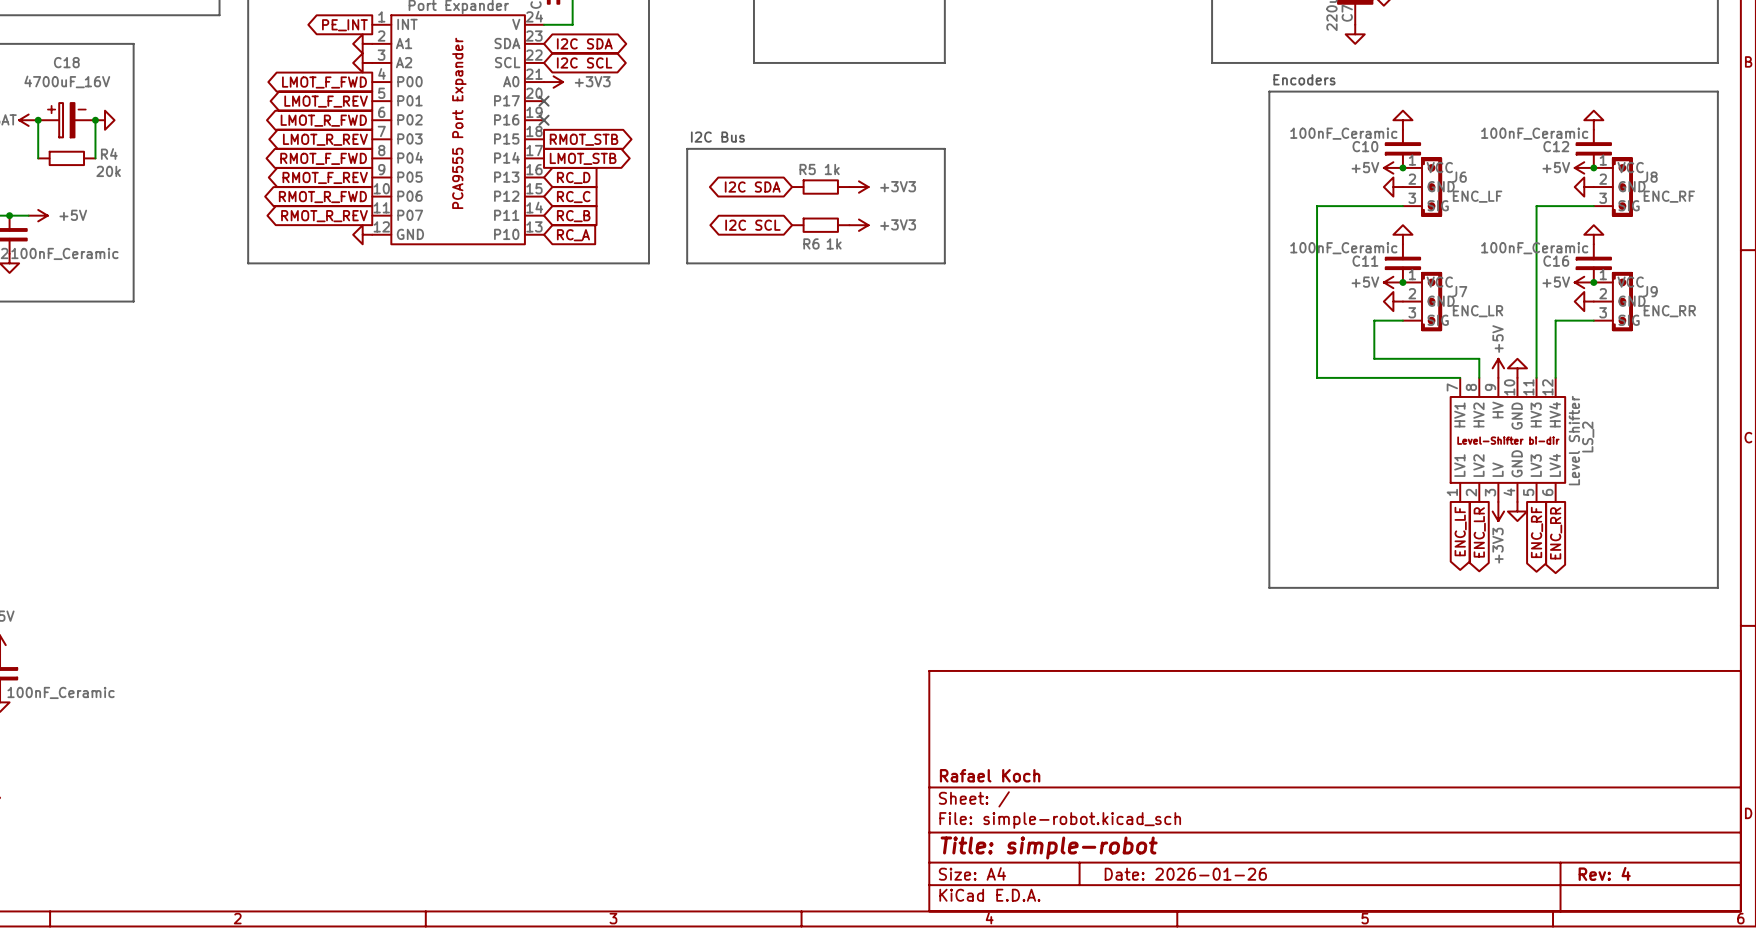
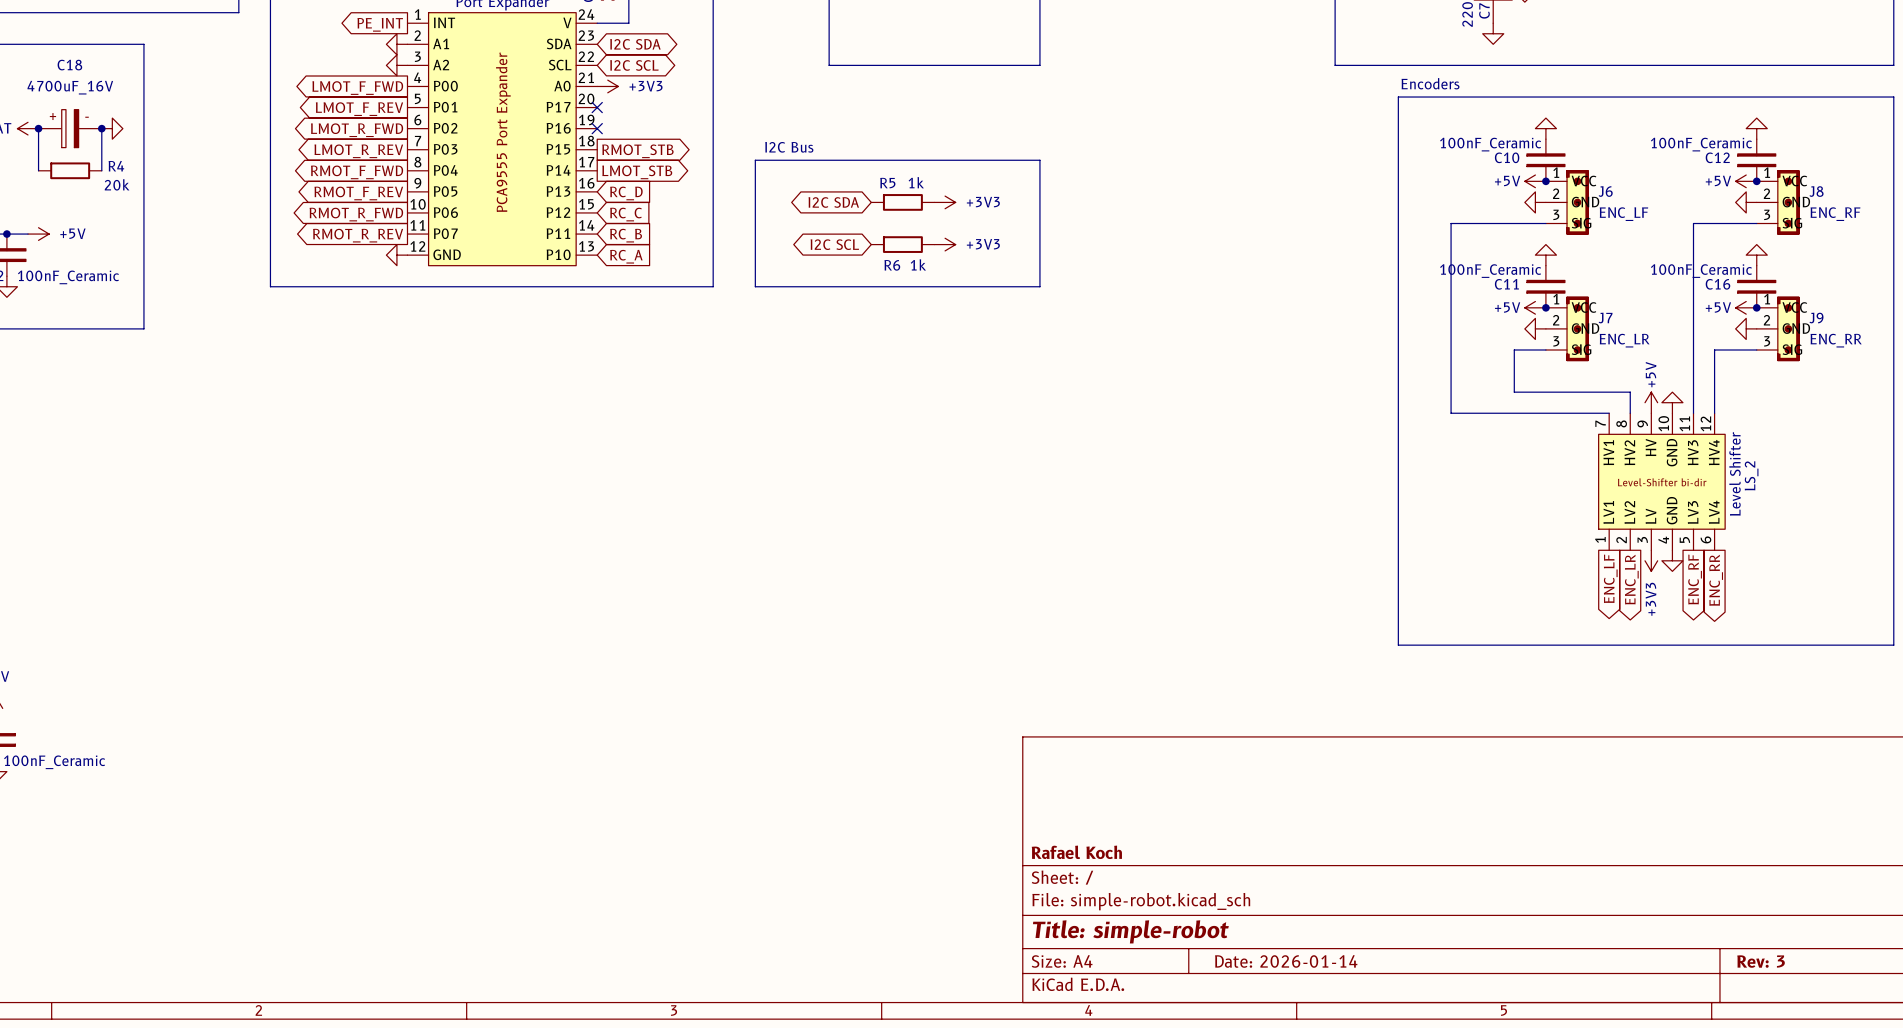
title block: Rev: 4 (1604, 873) -> Rev: 3 (1761, 961)
title block: Date: 2026-01-26 (1185, 874) -> Date: 2026-01-14 (1286, 961)

